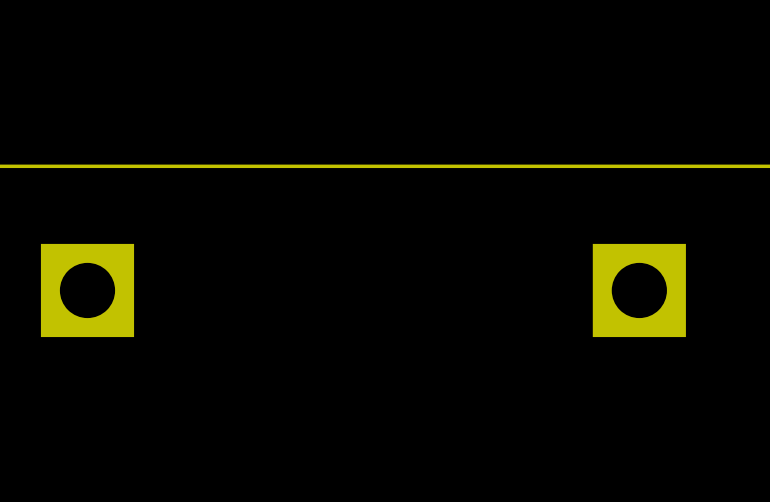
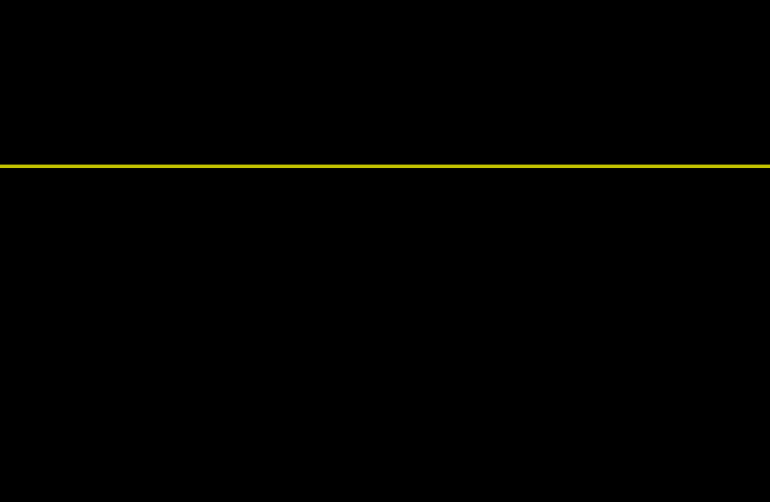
part: (87, 290) -> none
part: (639, 290) -> none

